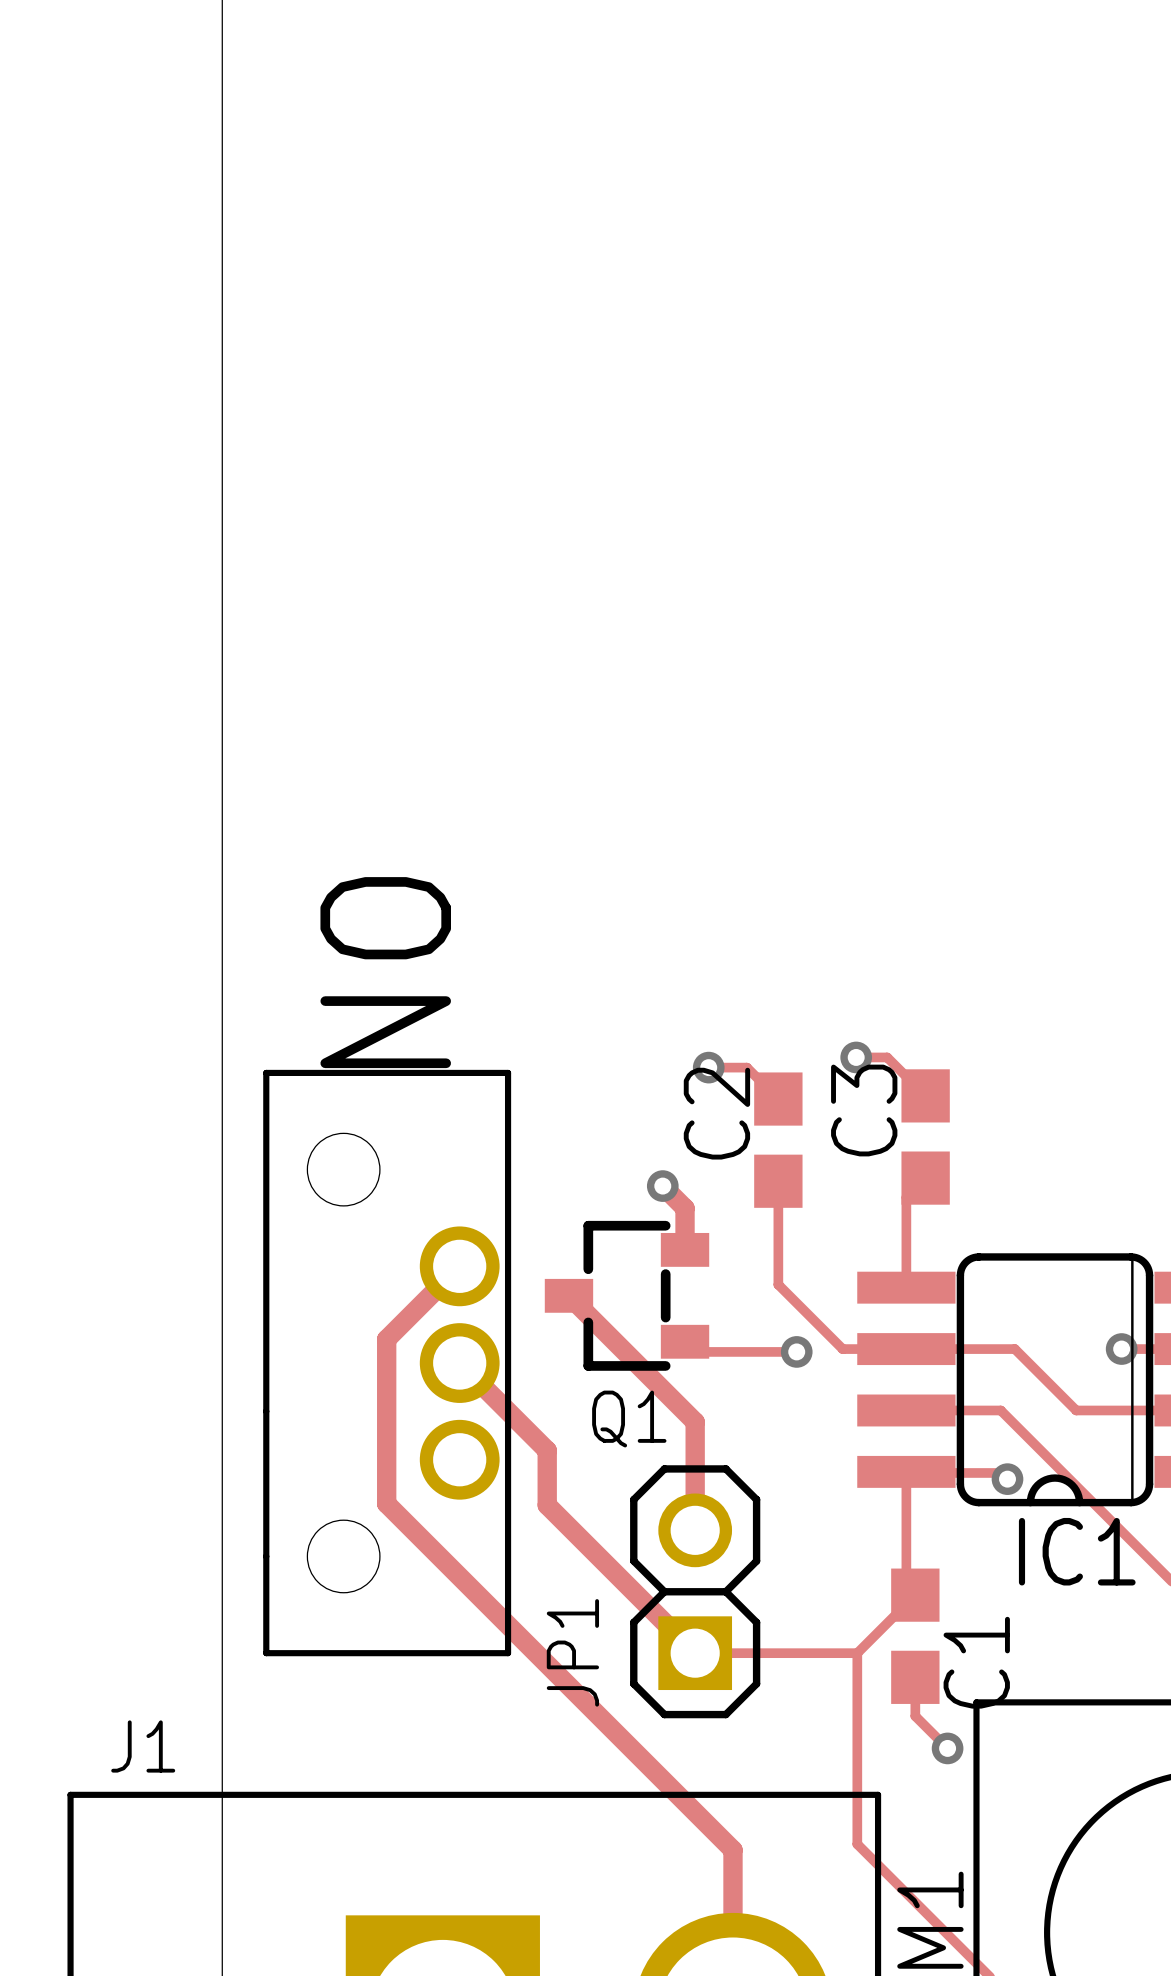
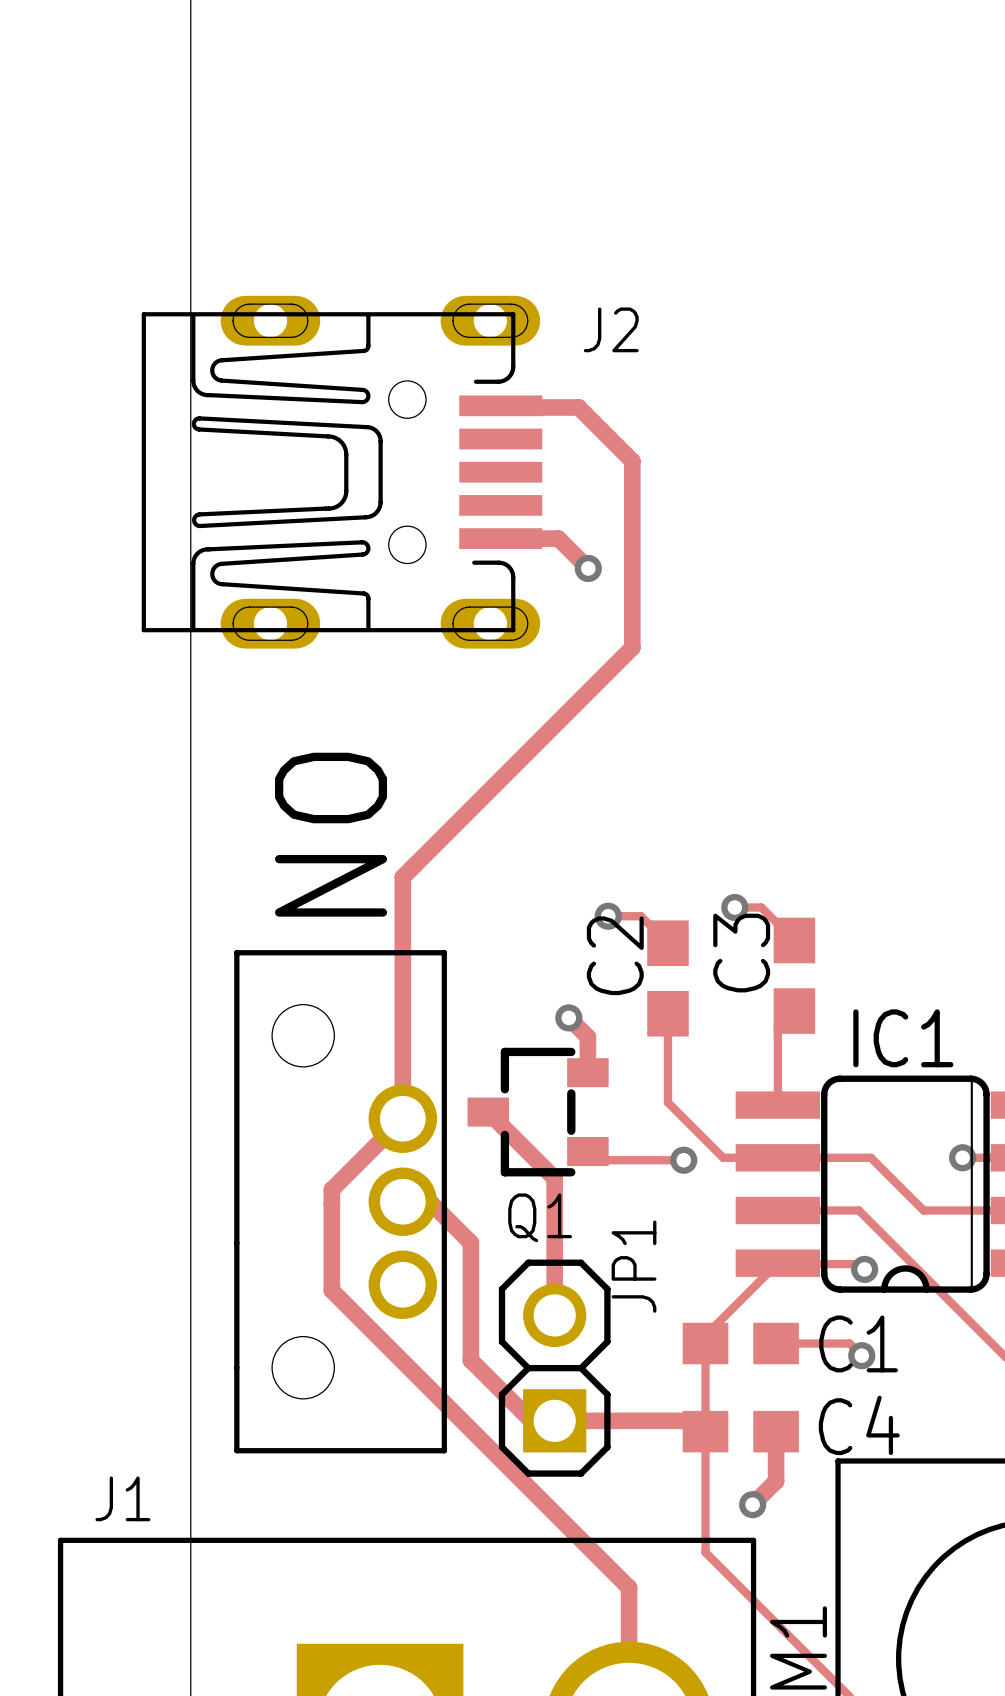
J2: none -> (341, 472)
track: none -> (500, 538) (558, 538) (588, 568)
via: none -> (588, 568)
track: (459, 1266) (386, 1339) (386, 1386) -> (500, 405) (502, 407) (578, 407) (632, 461) (632, 647) (402, 877) (402, 1118) (331, 1189)
part position: (387, 1363) -> (340, 1201)
track: (459, 1363) (547, 1450) (547, 1505) (695, 1653) (857, 1653) -> none
track: (646, 1373) (695, 1422) (695, 1530) -> (554, 1178) (554, 1315)
track: none -> (402, 1201) (429, 1201) (470, 1242) (470, 1360) (531, 1420) (694, 1420) (705, 1431)
track: (906, 1471) (906, 1604) -> none
IC1 name position: IC1 (1077, 1551) -> IC1 (903, 1038)
track: none -> (776, 1343) (849, 1343) (861, 1355)
via: none -> (861, 1355)
JP1 position: (695, 1591) -> (554, 1368)
track: (915, 1595) (857, 1653) -> none
C1 rotation: 0° (915, 1636) -> 90° clockwise (740, 1343)
C1 position: (915, 1636) -> (740, 1343)
JP1 name position: JP1 (572, 1652) -> JP1 (634, 1266)
track: (857, 1653) (857, 1844) -> (777, 1263) (705, 1335) (705, 1552) (735, 1582)
C4: none -> (740, 1431)
track: none -> (776, 1431) (776, 1481) (752, 1504)
track: (915, 1677) (915, 1716) (947, 1748) -> none
via position: (947, 1748) -> (752, 1504)

